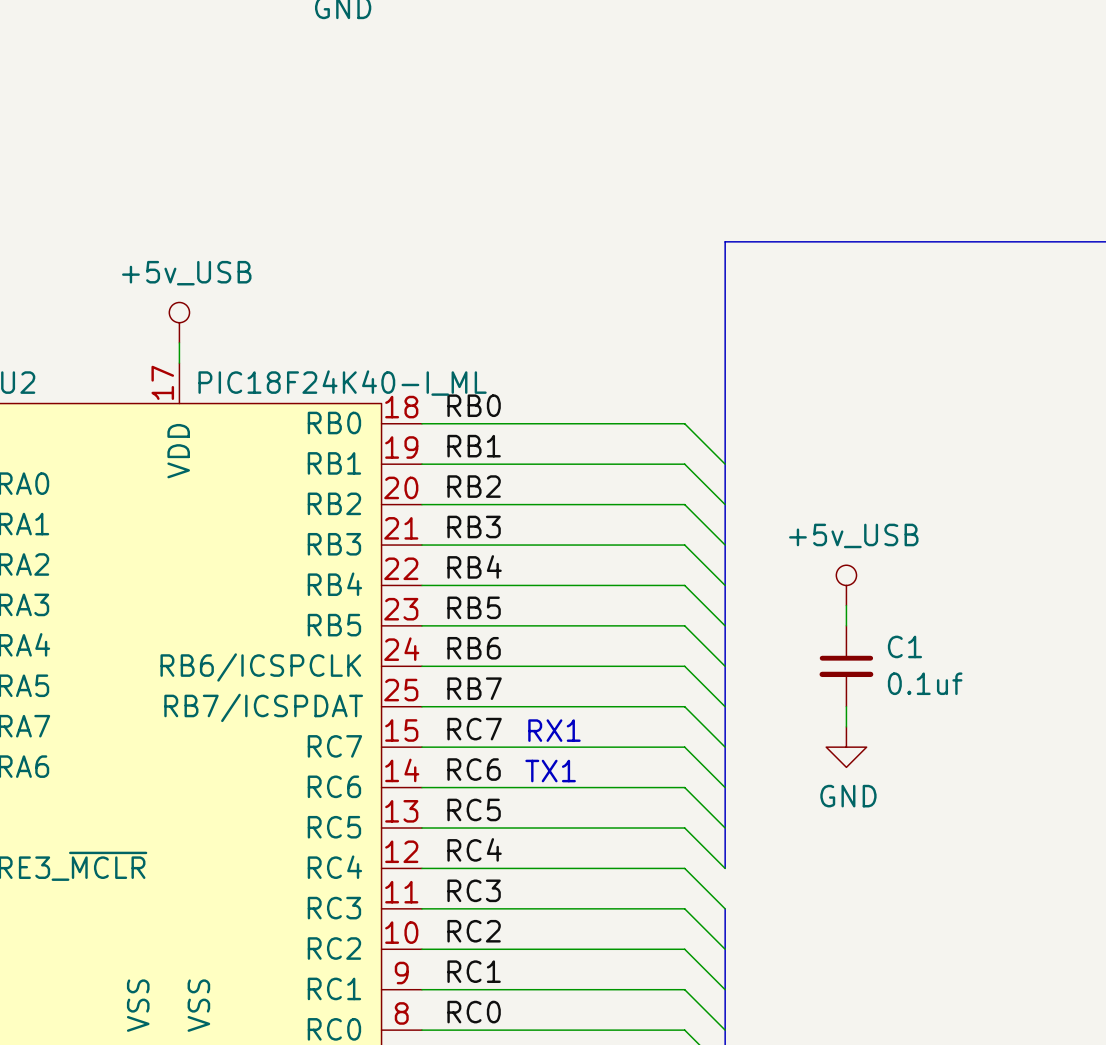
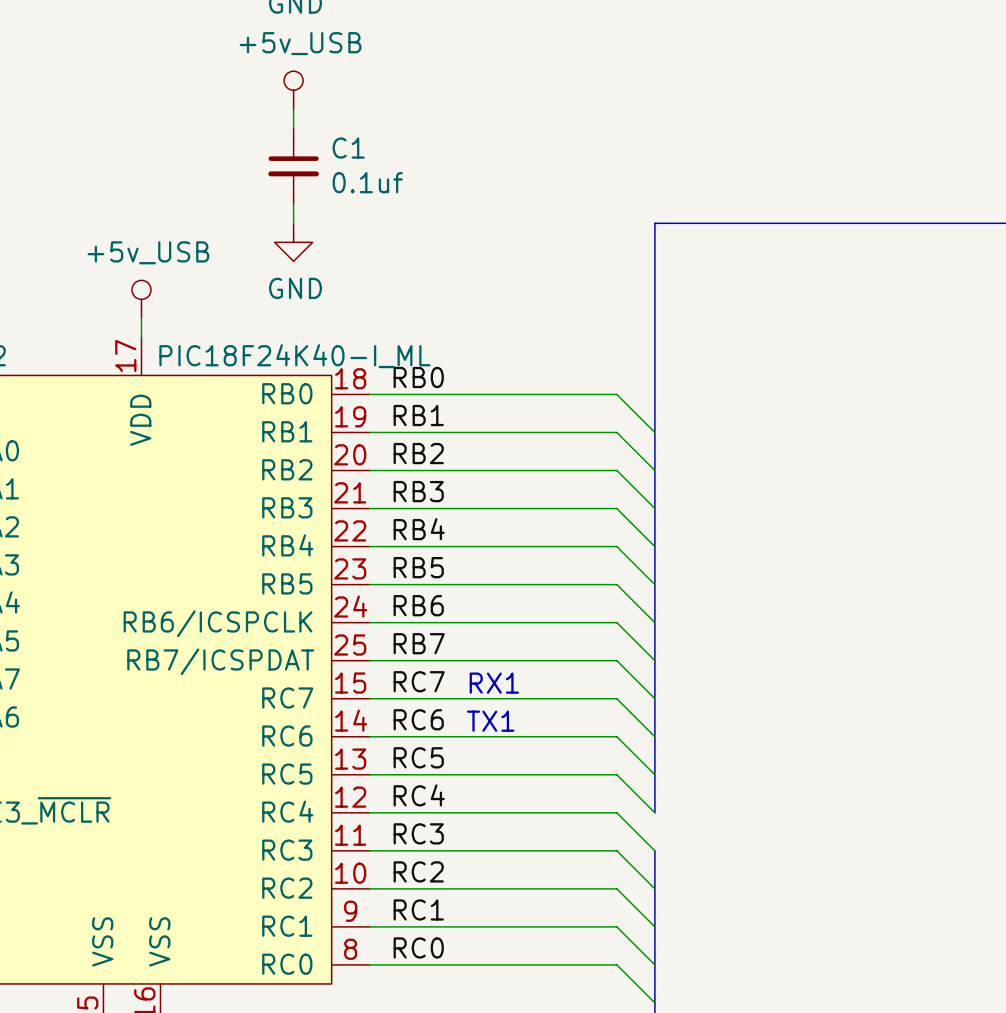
power symbol: none -> +5v_USB (293, 90)
wire: none -> (293, 109) (293, 128)
wire: none -> (293, 204) (293, 223)
power symbol: none -> GND (293, 242)
power symbol: +5v_USB (846, 585) -> none
wire: (846, 605) (846, 625) -> none
C1 position: (846, 666) -> (293, 166)
wire: (846, 706) (846, 726) -> none
power symbol: GND (846, 747) -> none

